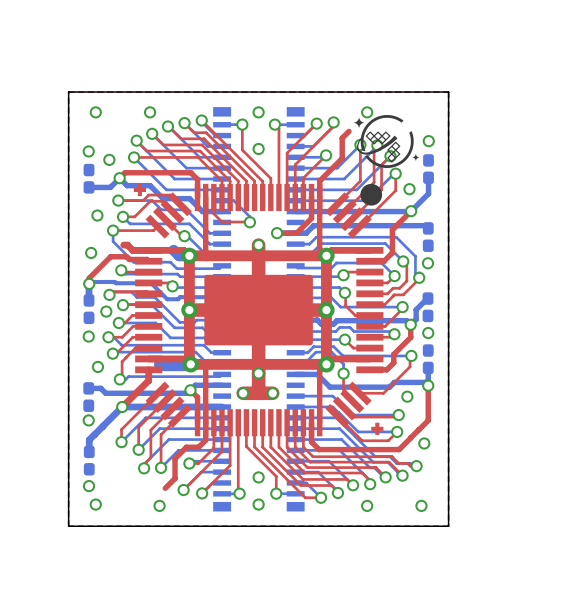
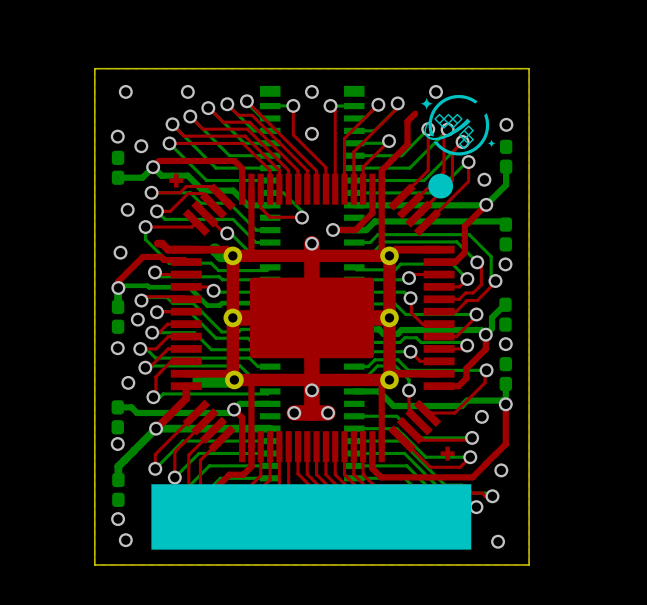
drawing: none -> [151, 484, 472, 550]

